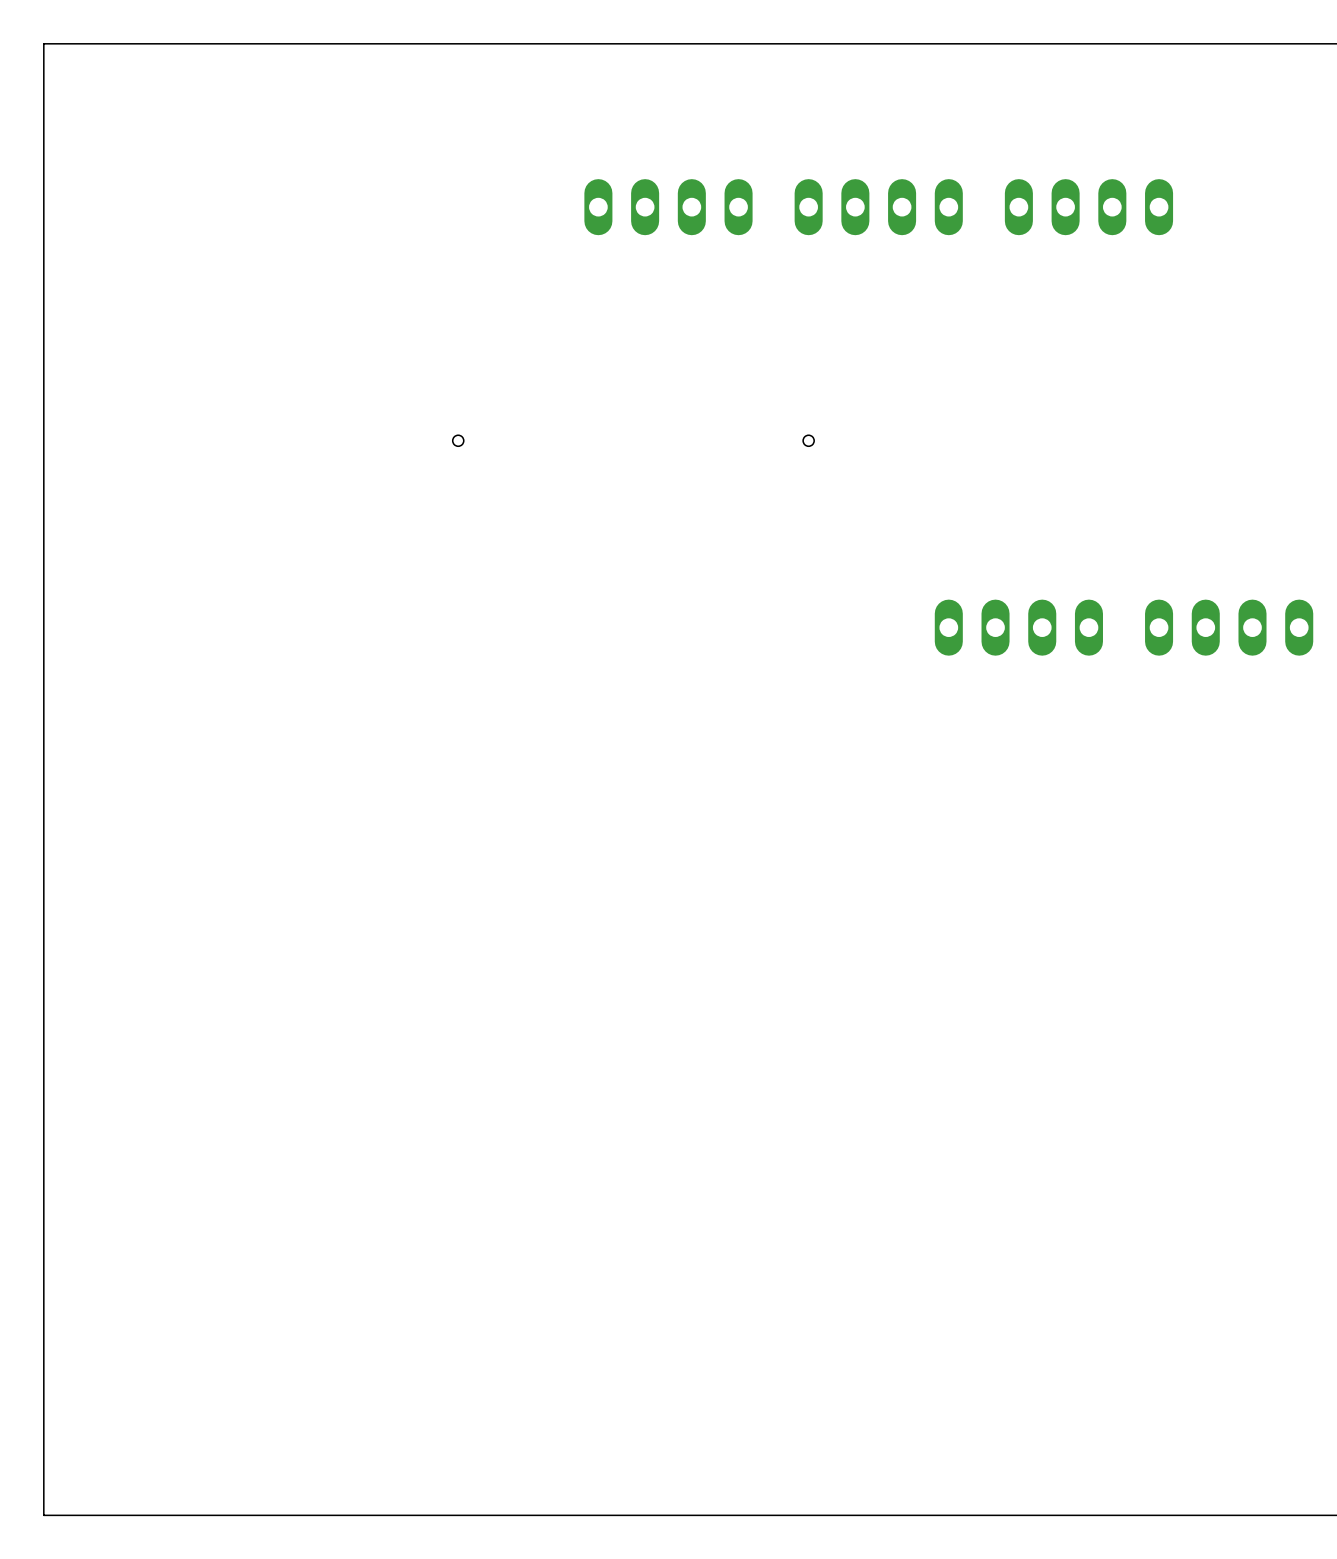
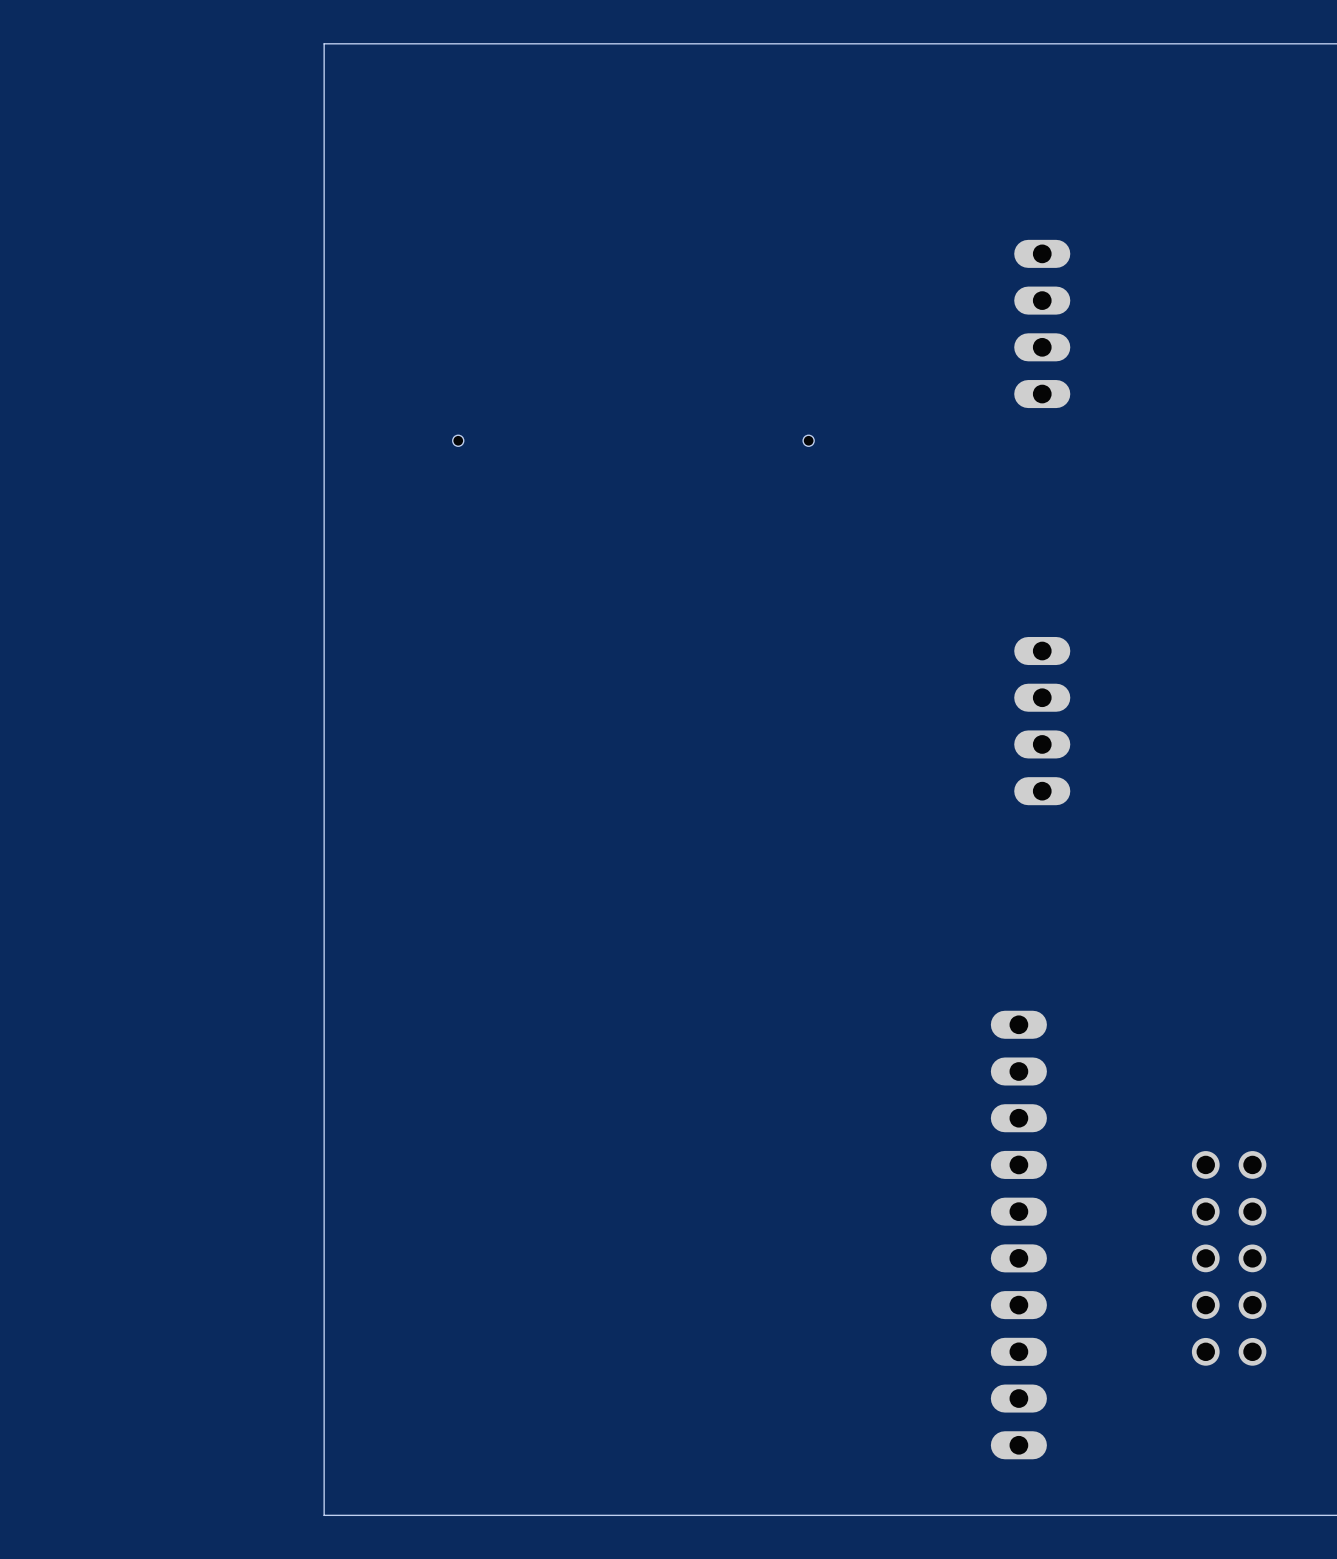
board edge: (324, 43) (43, 43) (43, 1515) (324, 1515) -> (324, 43) (324, 1515)
part: (668, 207) -> none
part: (878, 207) -> none
part: (1088, 207) -> none
part: none -> (1042, 323)
part rotation: 0° (1018, 627) -> 90° clockwise (1042, 721)
part: (1229, 627) -> none
part: none -> (1018, 1235)
part: none -> (1229, 1258)

